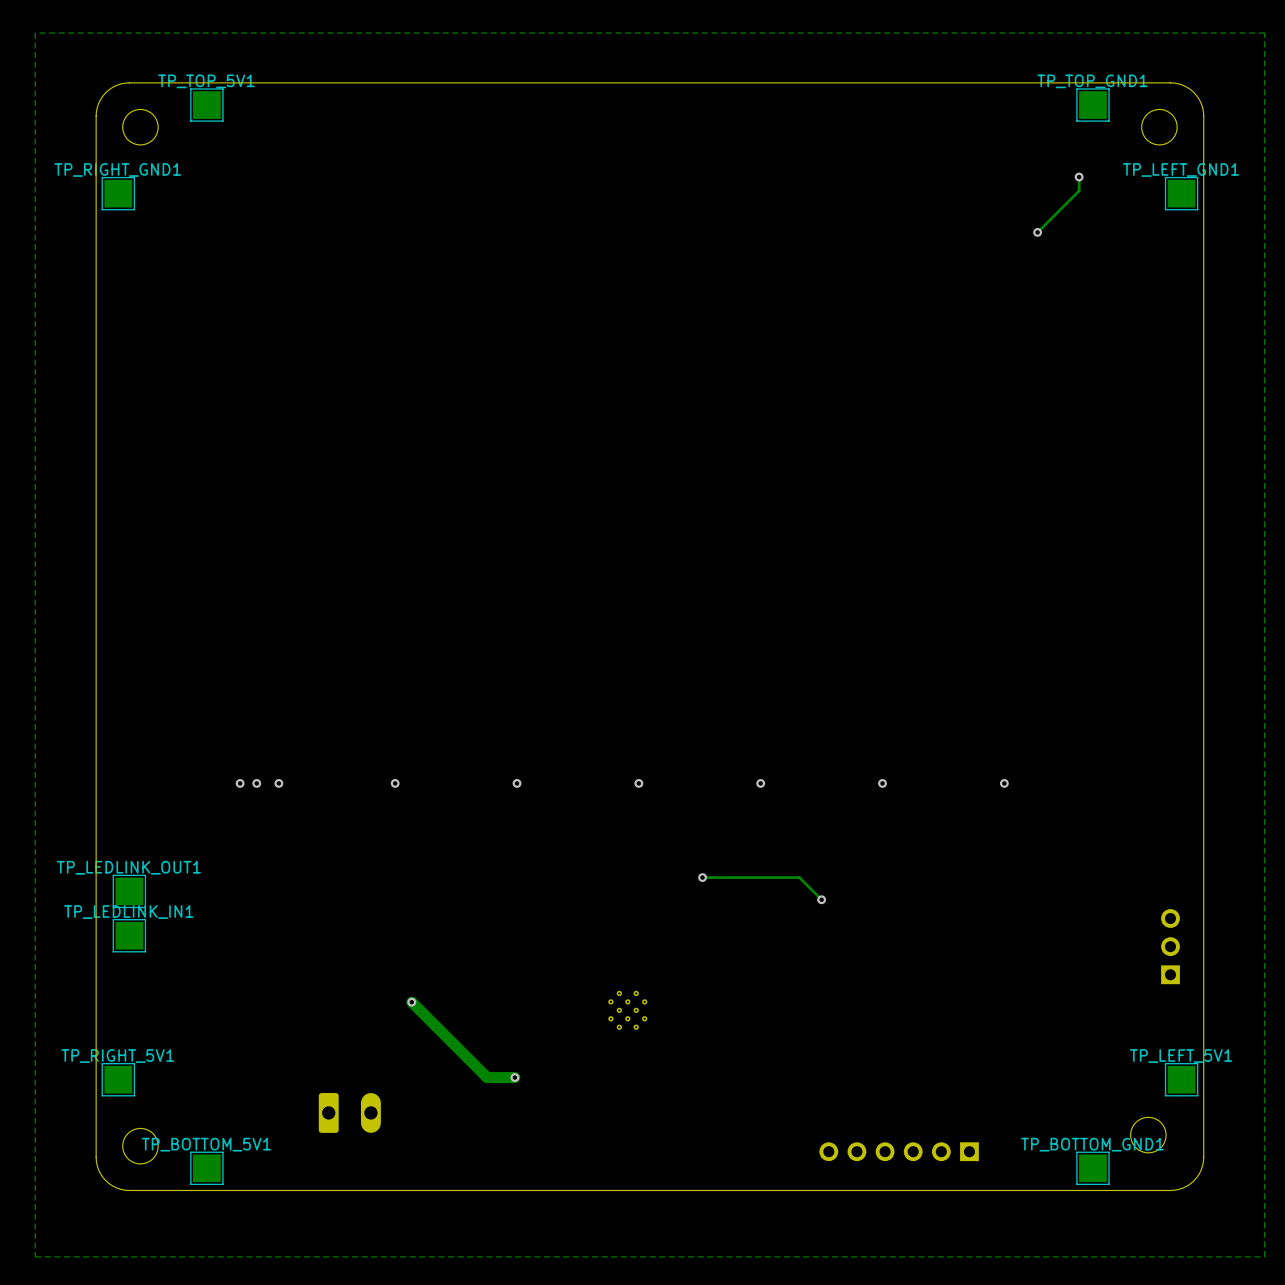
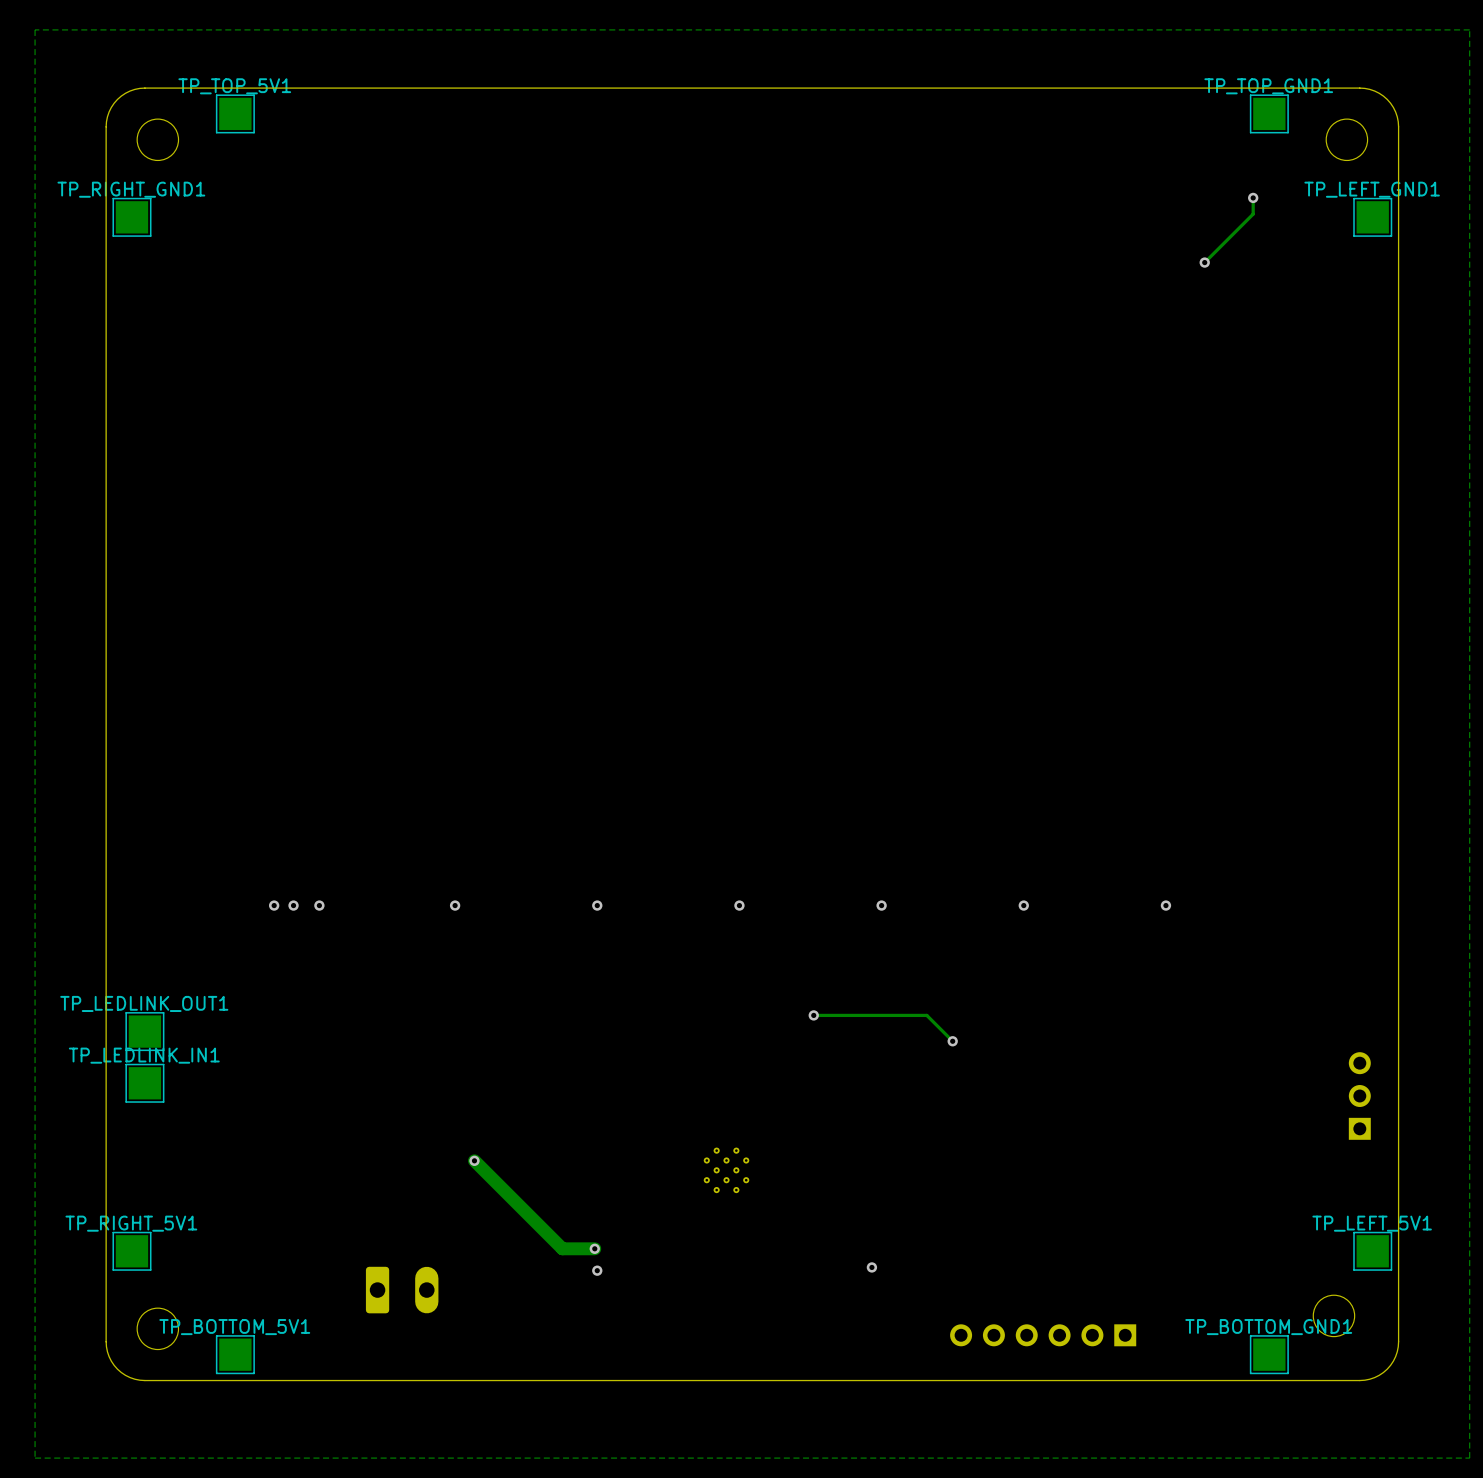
via: none -> (871, 1267)
via: none -> (597, 1270)

